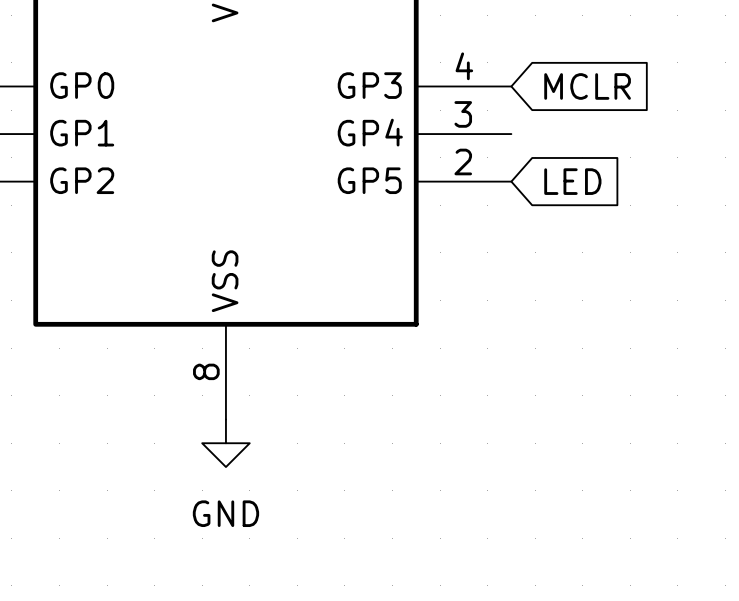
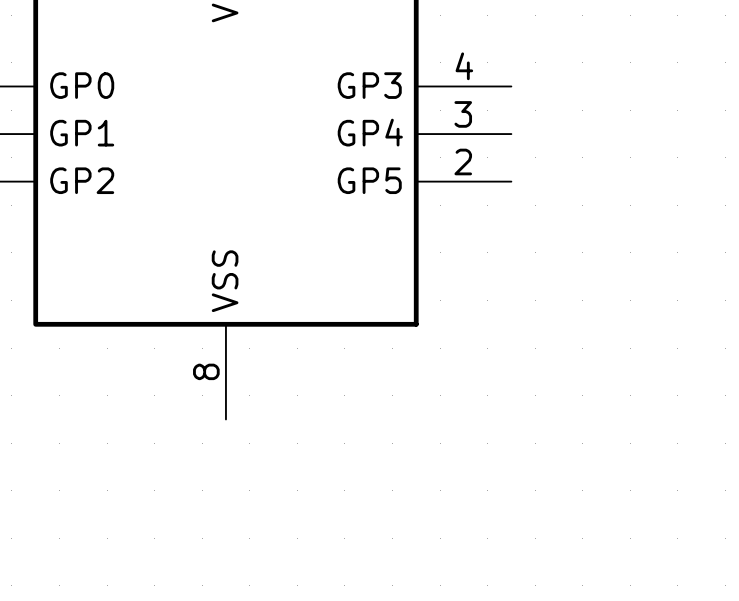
global label: MCLR (587, 86) -> none
global label: LED (572, 181) -> none
power symbol: GND (225, 443) -> none

